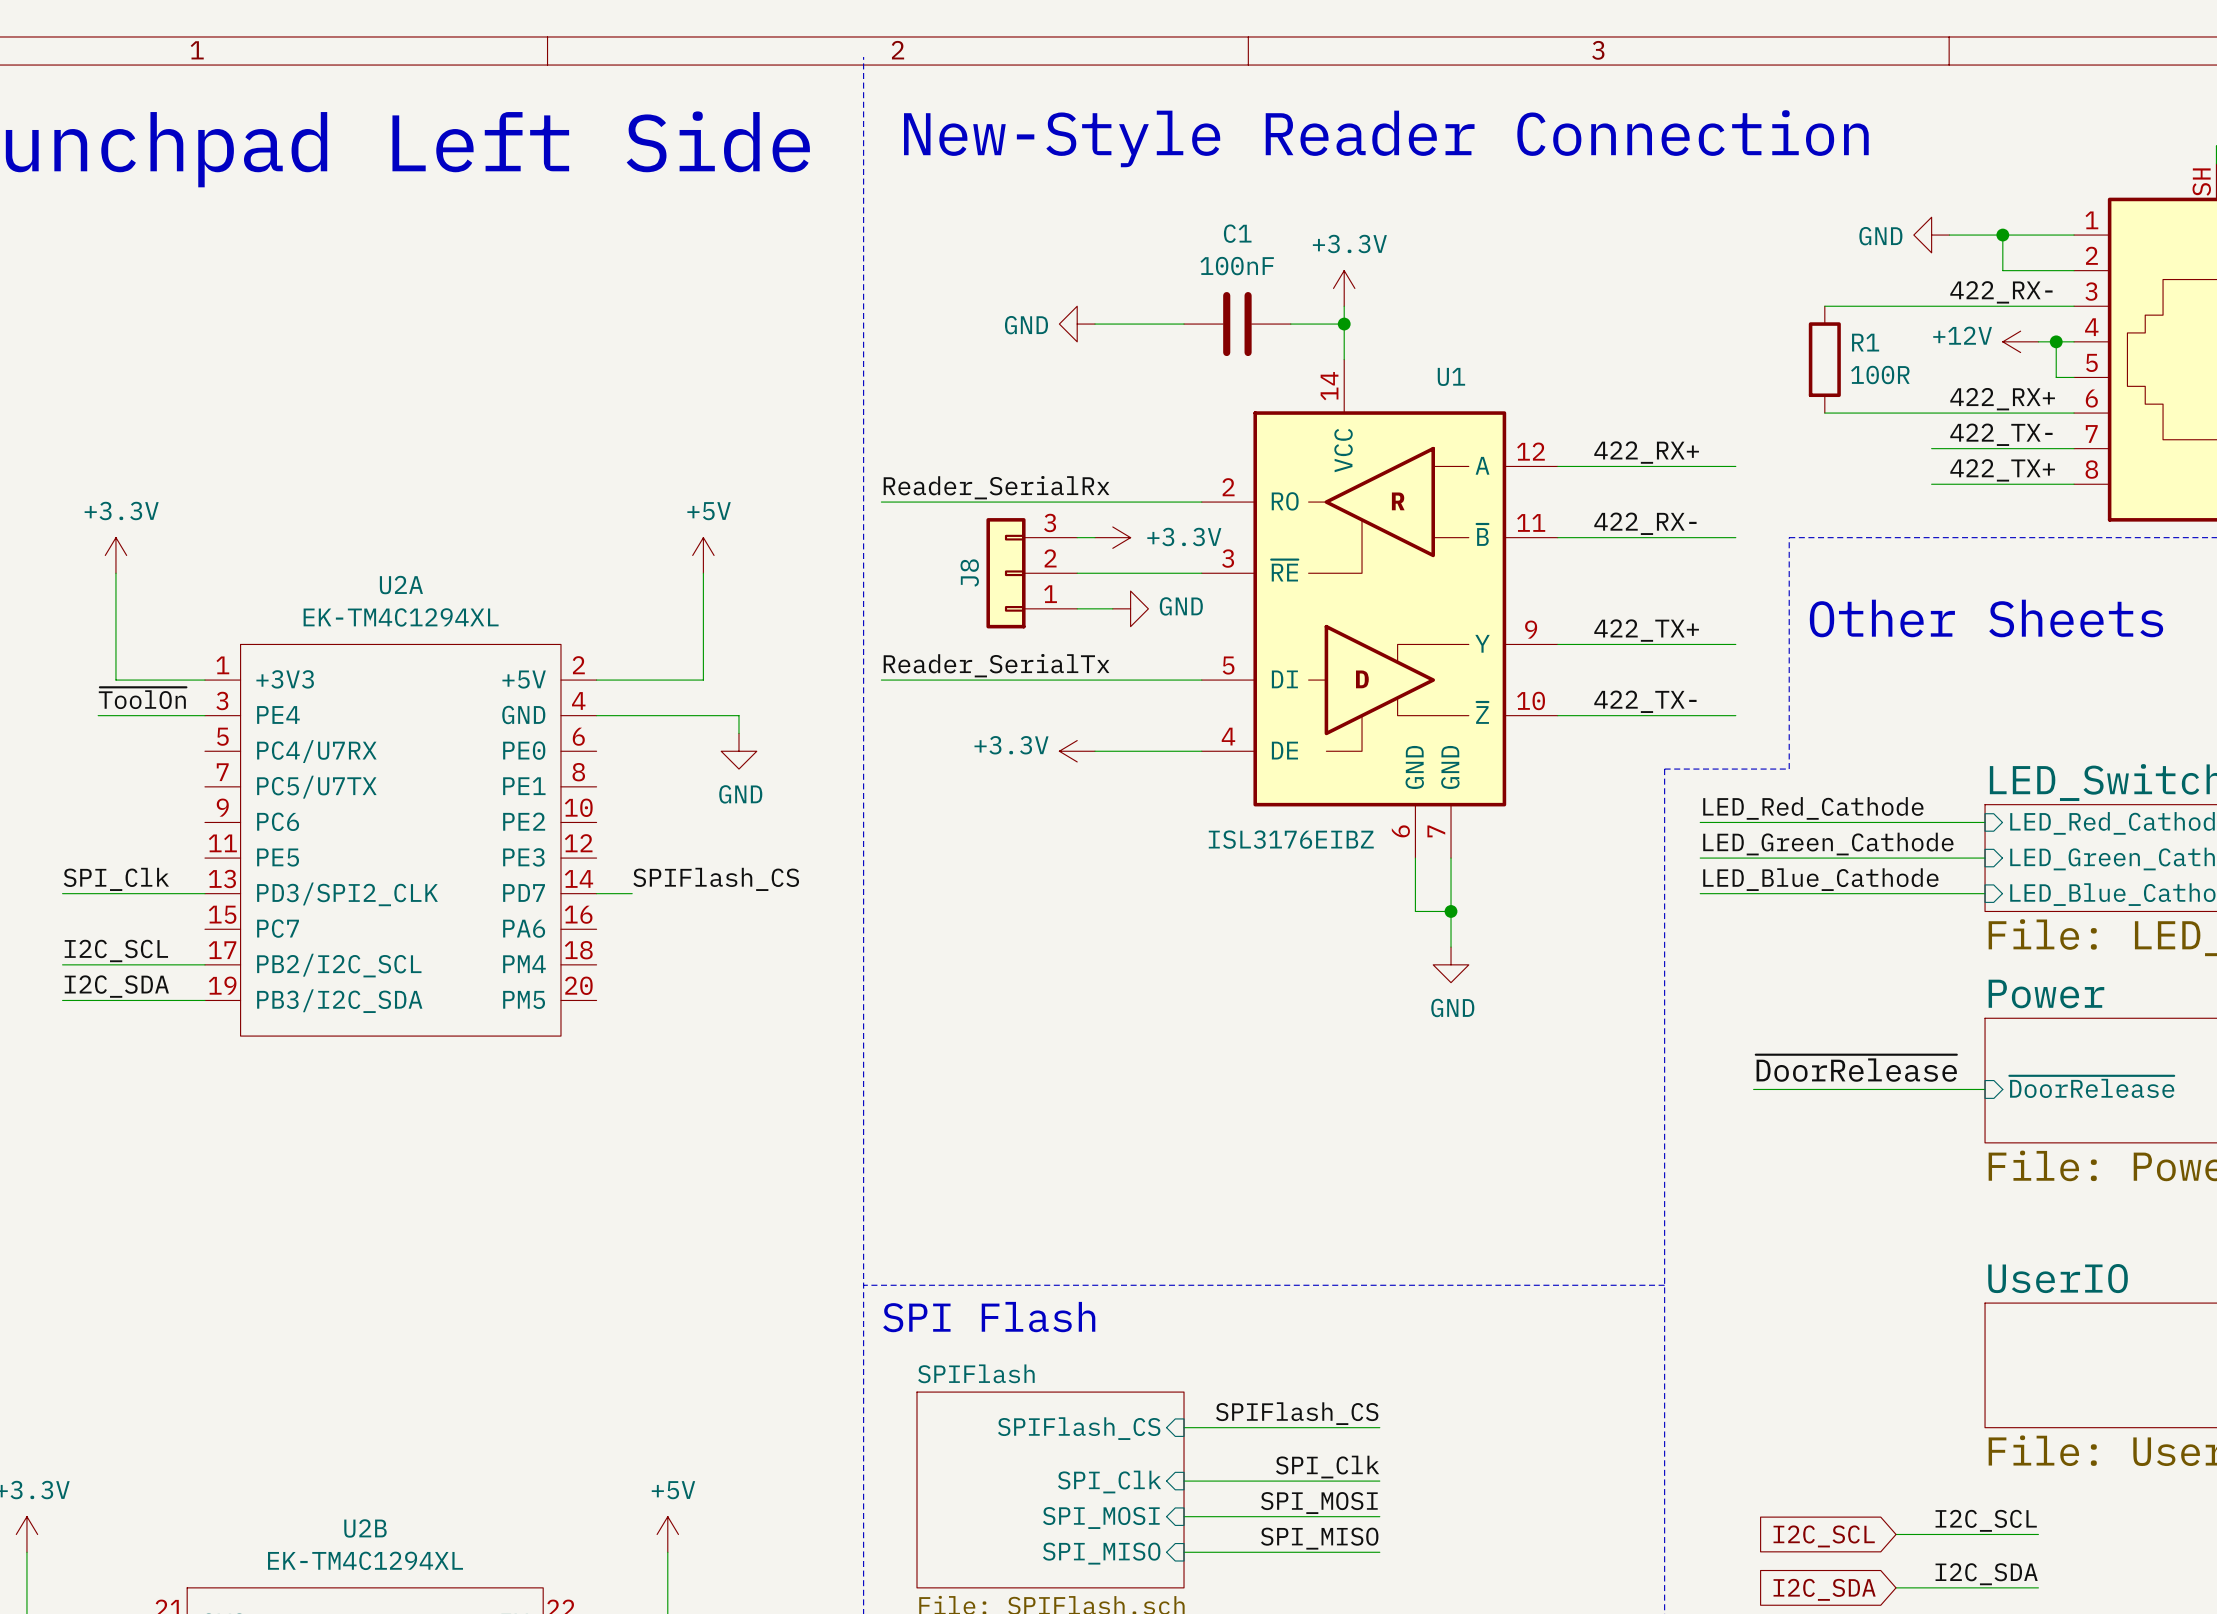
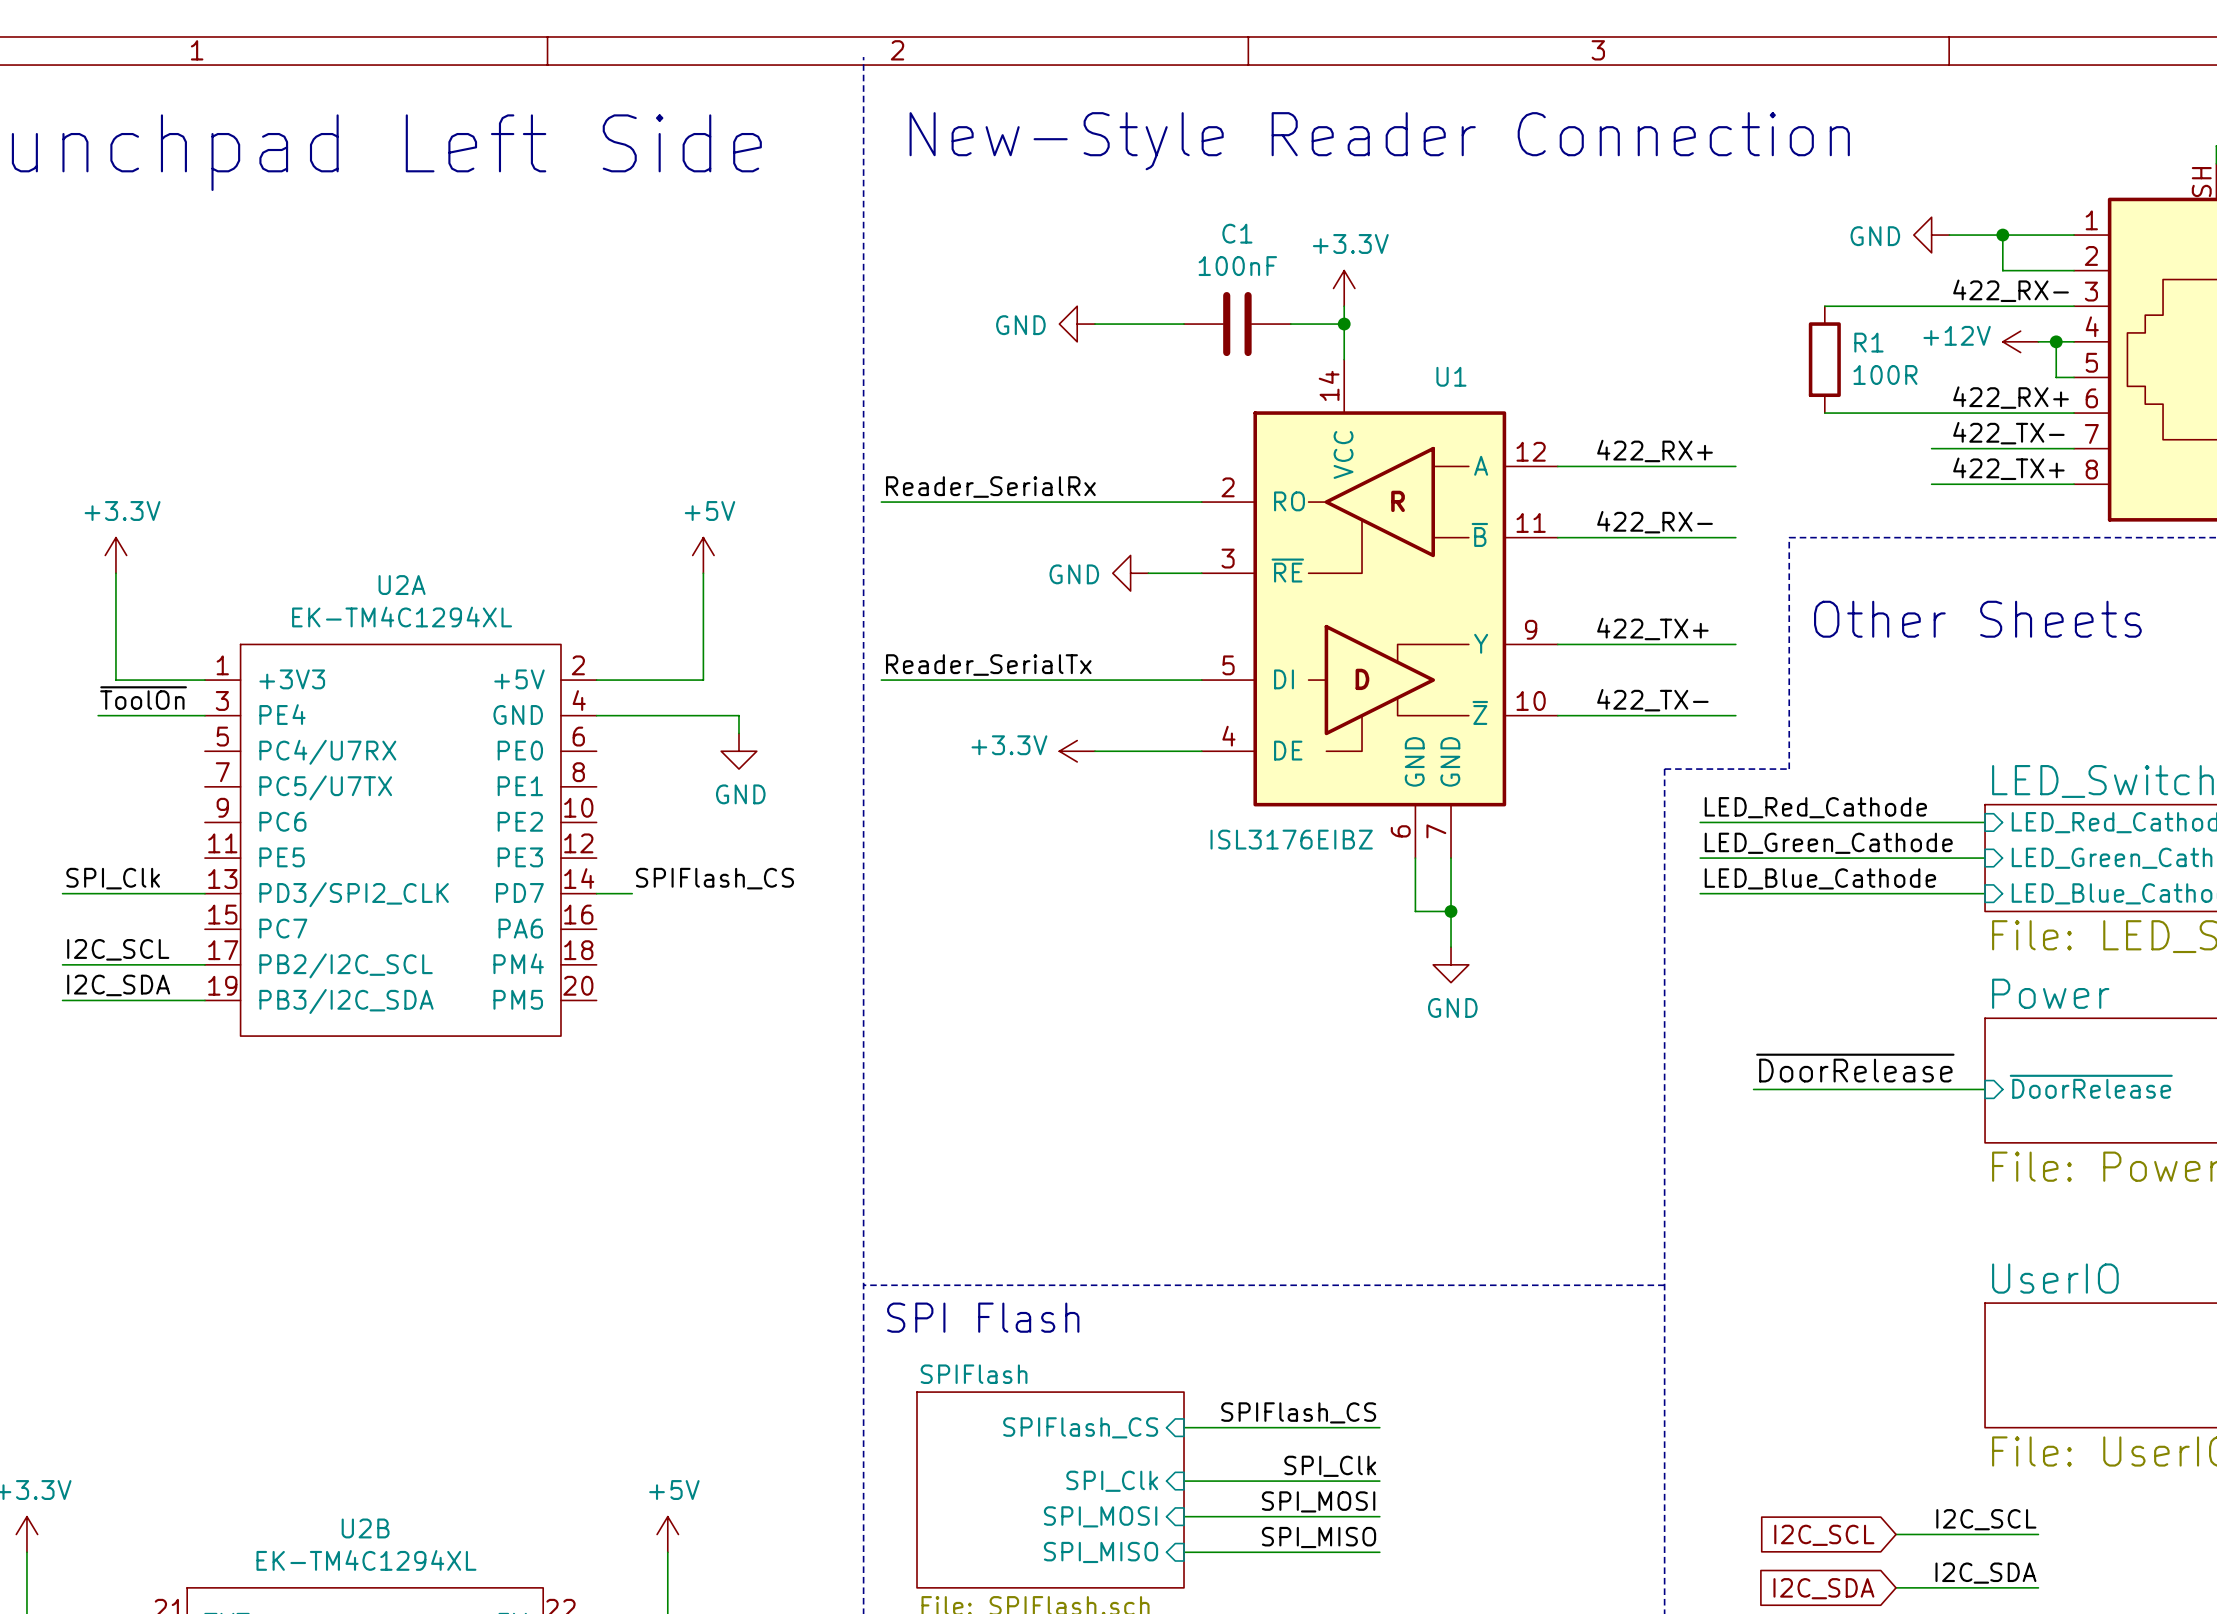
wire: (1077, 537) (1095, 537) -> none
power symbol: +3.3V (1112, 537) -> none
J8: (1031, 573) -> none
wire: (1077, 573) (1148, 573) -> none
wire: (1077, 608) (1112, 608) -> none
power symbol rotation: 0° (1130, 608) -> 180° (1130, 573)
power symbol position: GND (1130, 608) -> GND (1130, 573)

